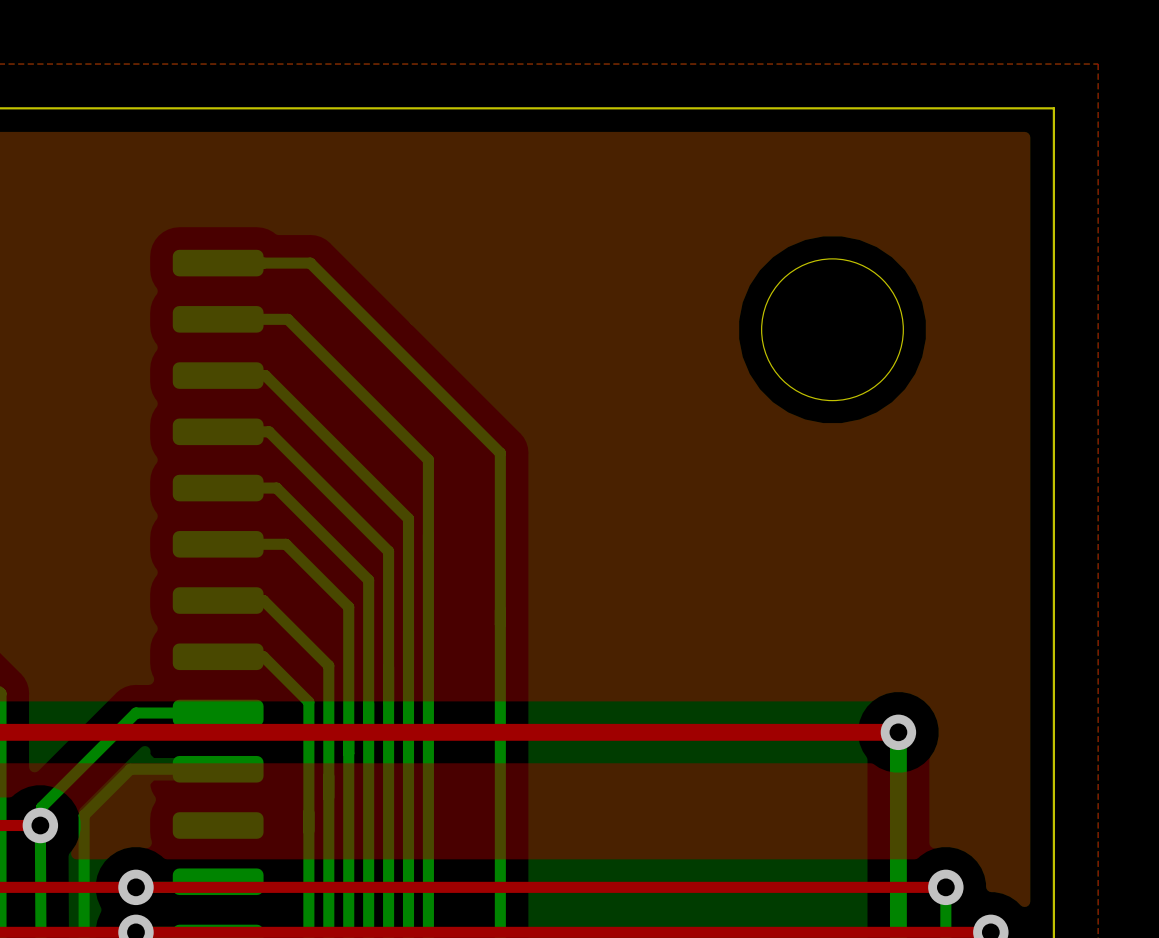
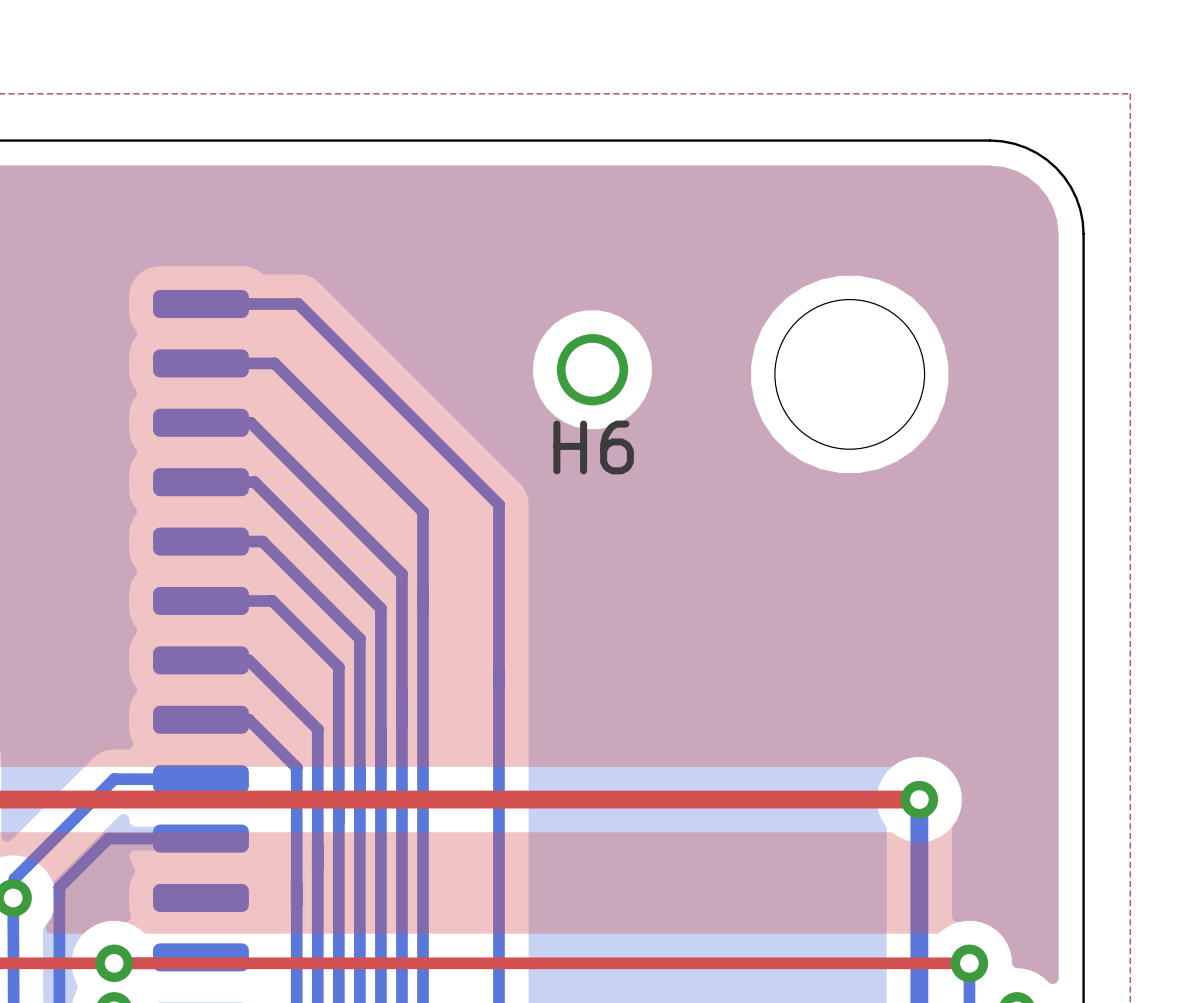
board edge: (965, 108) (1053, 108) (1053, 196) -> (990, 140) (1014, 143) (1025, 147) (1036, 153) (1056, 167) (1064, 177) (1076, 198) (1082, 221) (1083, 234)
H6: none -> (592, 369)

